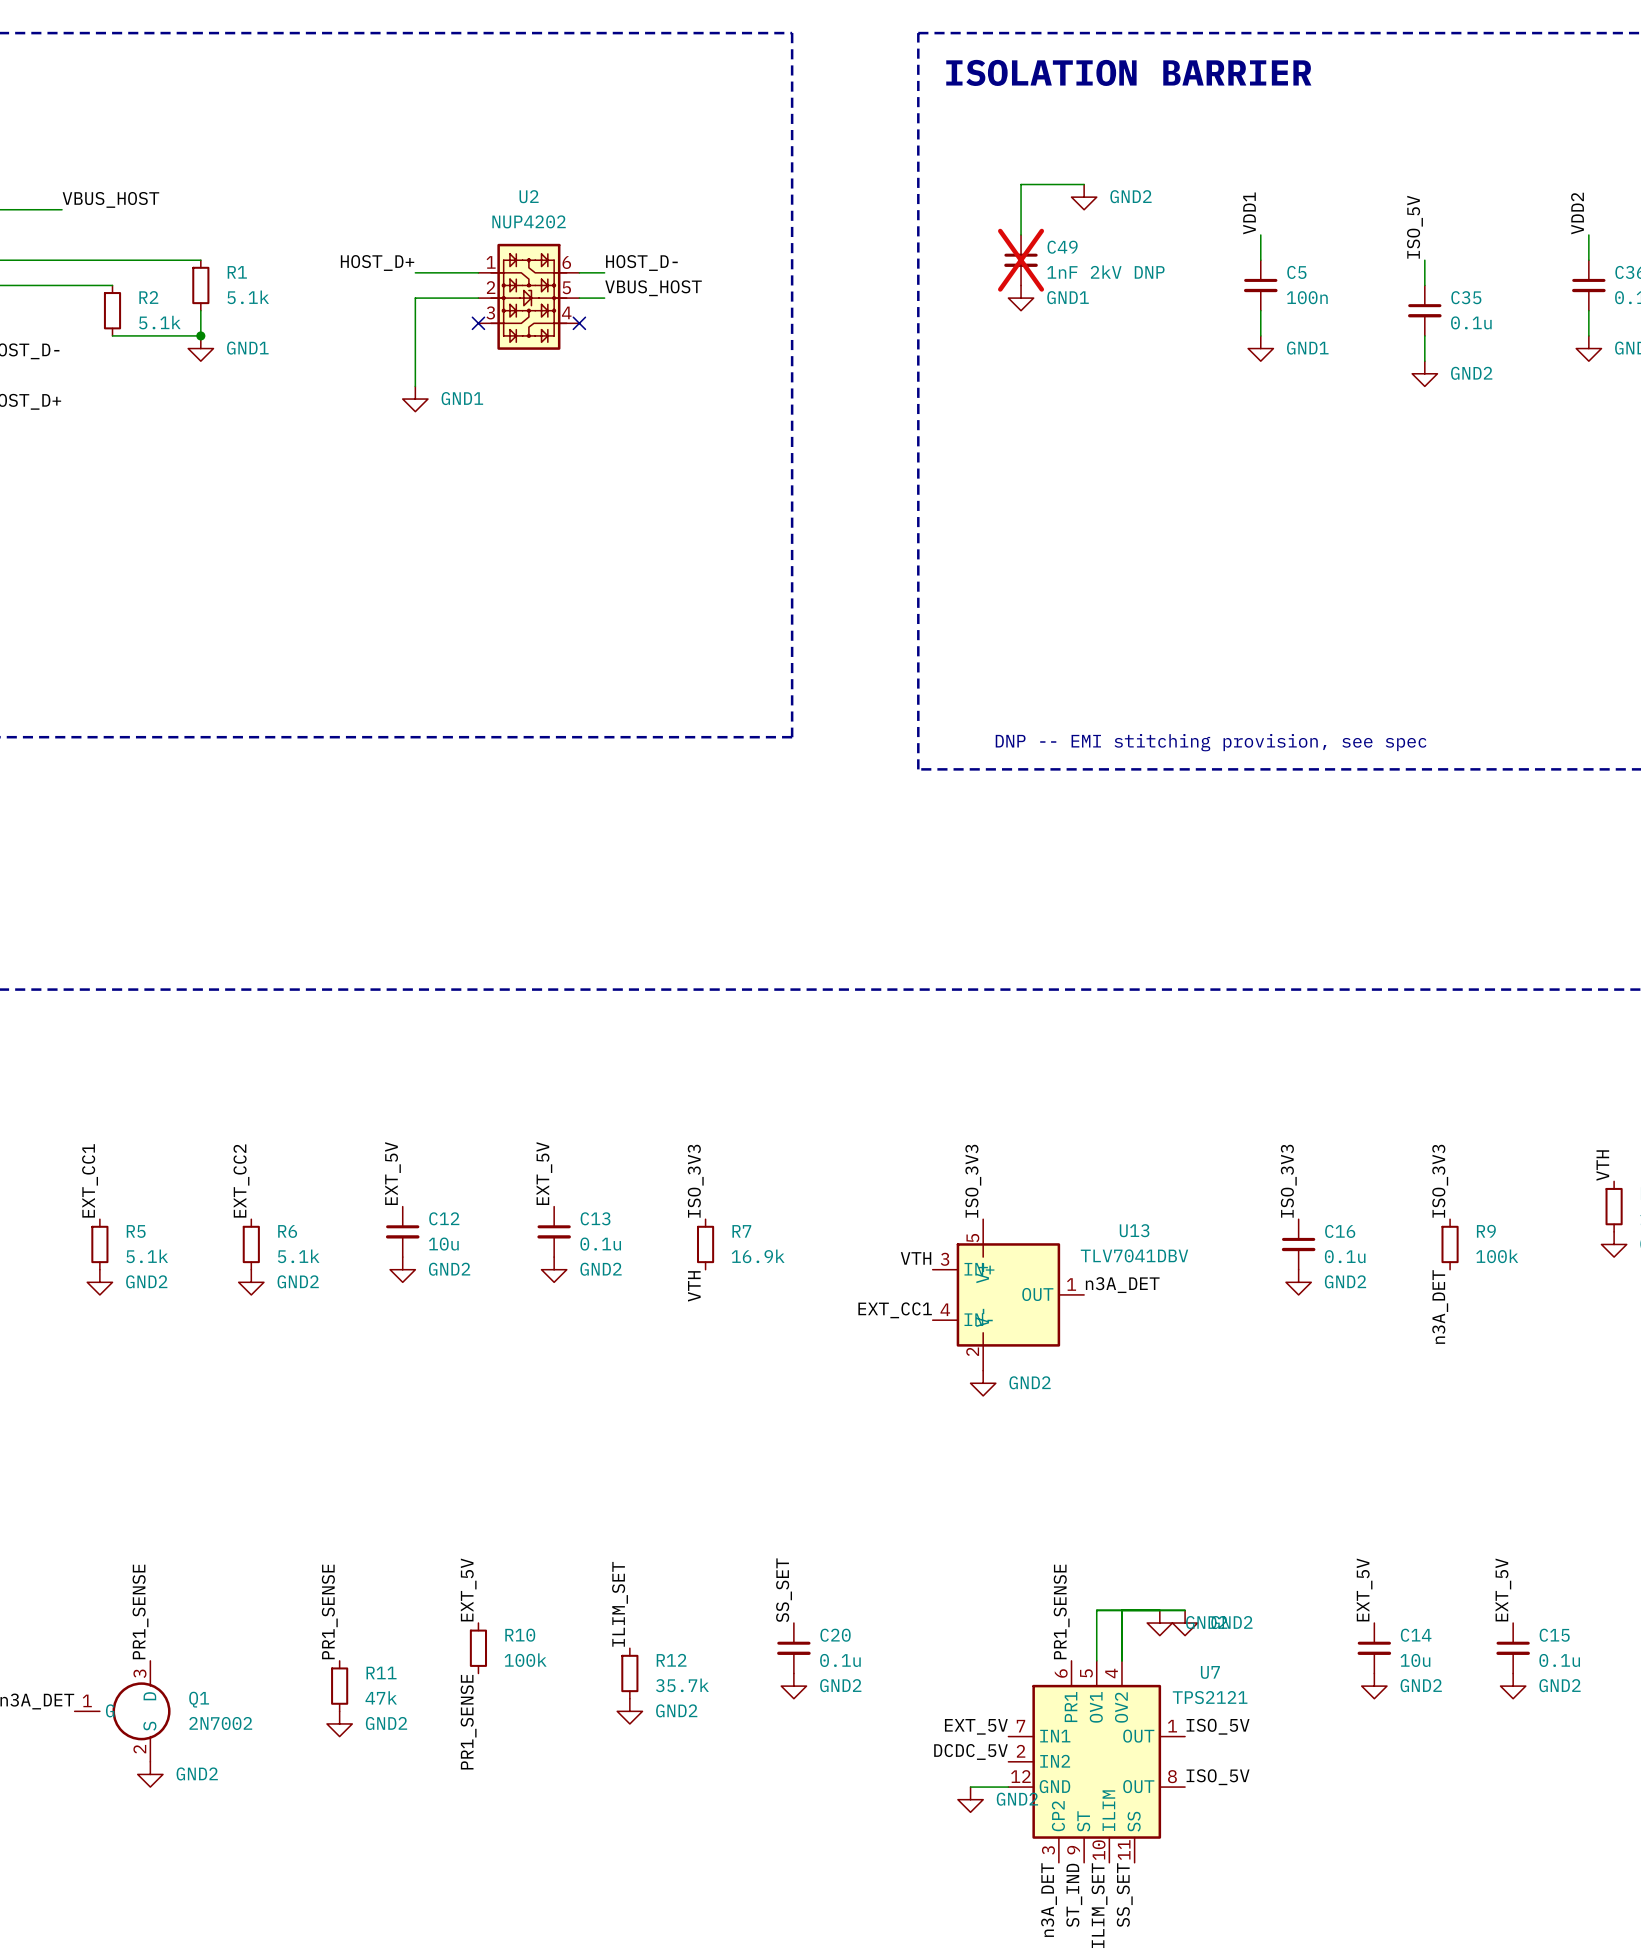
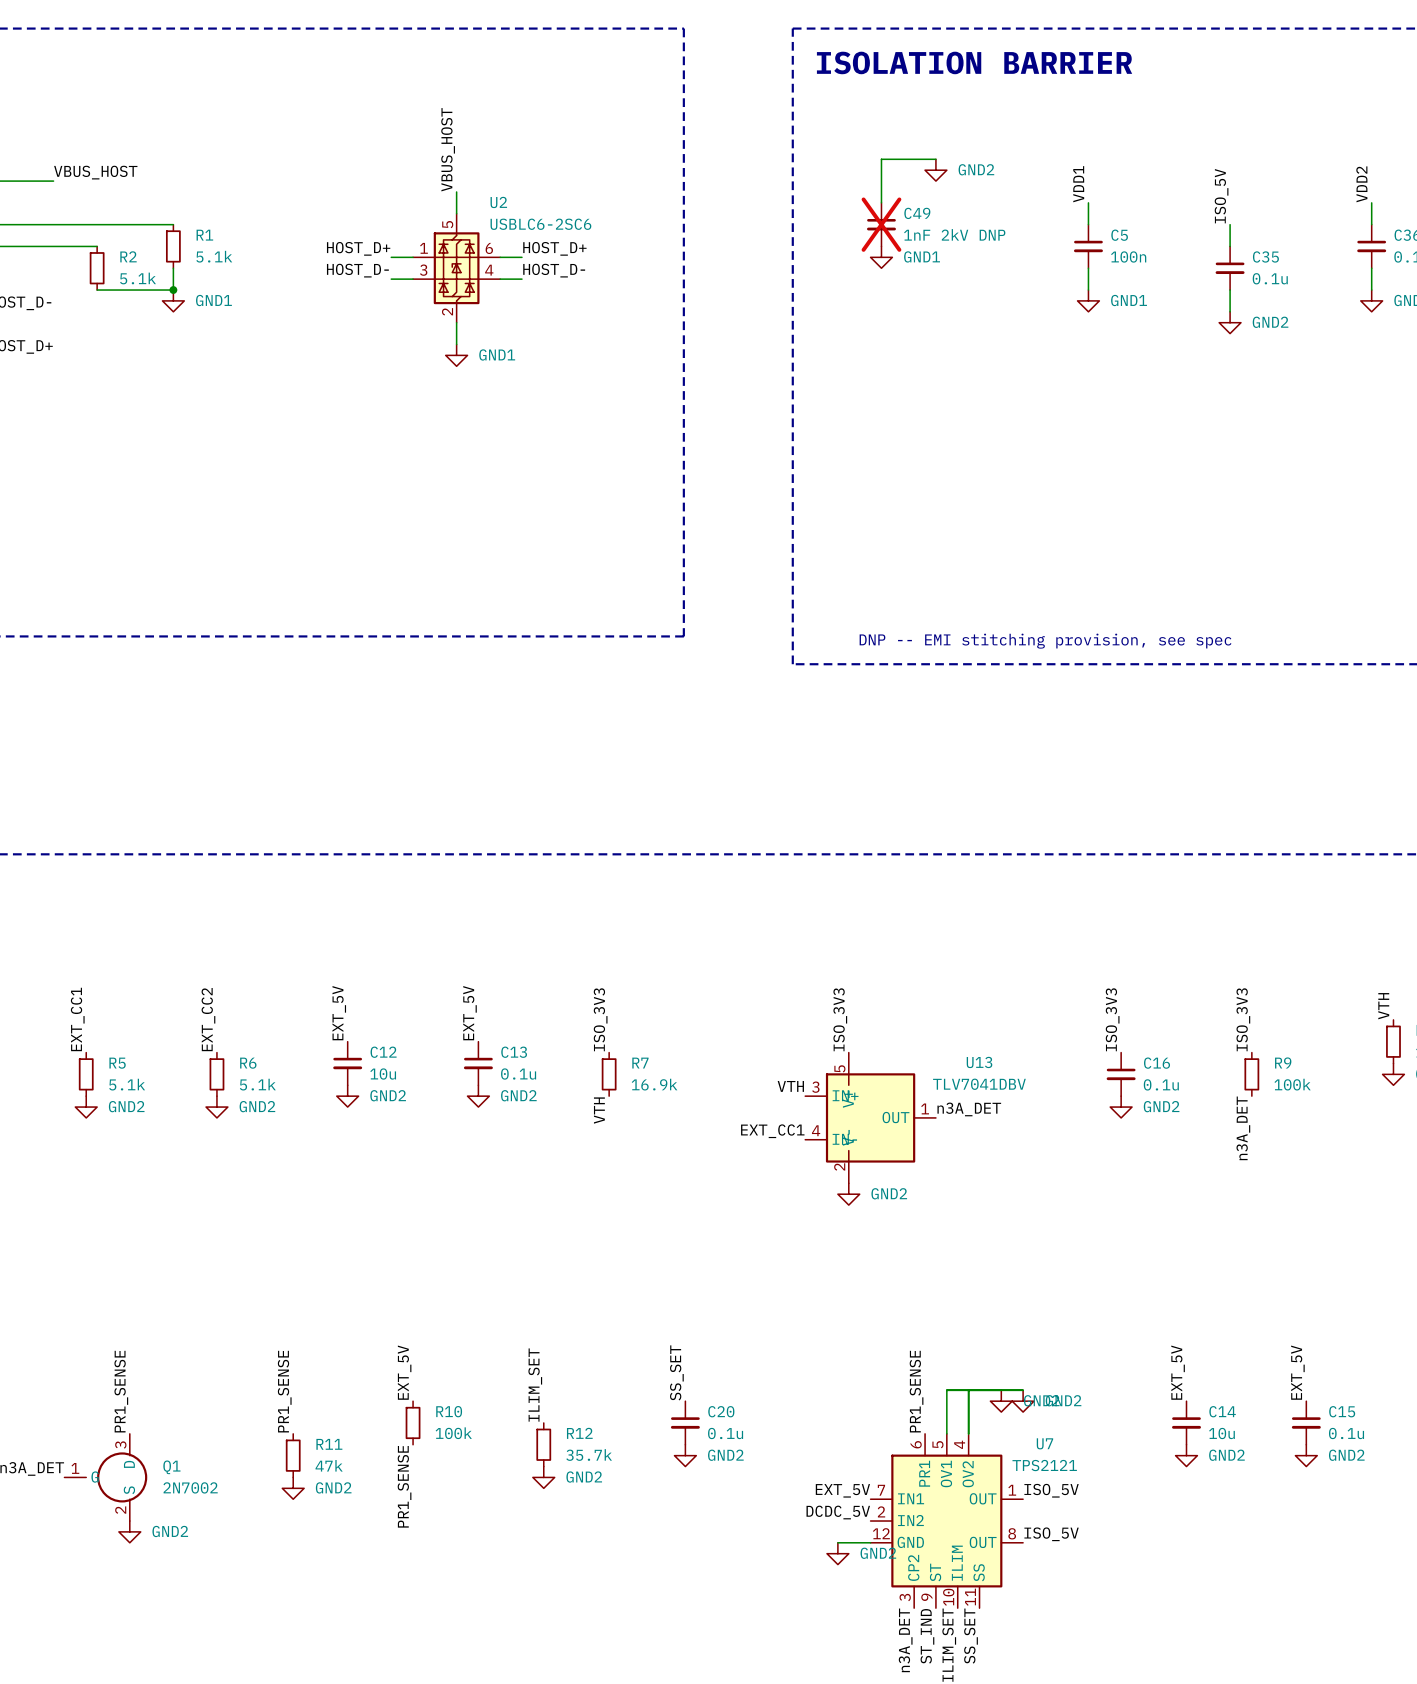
label: none -> VBUS_HOST (448, 149)
U2 name position: U2 (529, 196) -> U2 (498, 202)
U2 value: NUP4202 (529, 221) -> USBLC6-2SC6 (540, 224)
wire: none -> (456, 191) (456, 213)
U2 symbol: [478, 243, 580, 350] -> [413, 213, 501, 323]
label position: HOST_D+ (377, 263) -> HOST_D+ (358, 248)
label position: HOST_D- (641, 263) -> HOST_D- (554, 270)
wire: (415, 272) (478, 272) -> none
wire: (579, 272) (604, 272) -> (500, 279) (521, 279)
label: VBUS_HOST (653, 288) -> HOST_D+ (554, 248)
wire: (453, 298) (415, 298) (415, 386) -> none
label: none -> HOST_D- (357, 270)
wire: none -> (391, 279) (413, 279)
no-connect mark: (478, 323) -> none
no-connect mark: (579, 323) -> none
wire: none -> (456, 322) (456, 344)
power symbol position: GND1 (415, 399) -> GND1 (456, 355)

